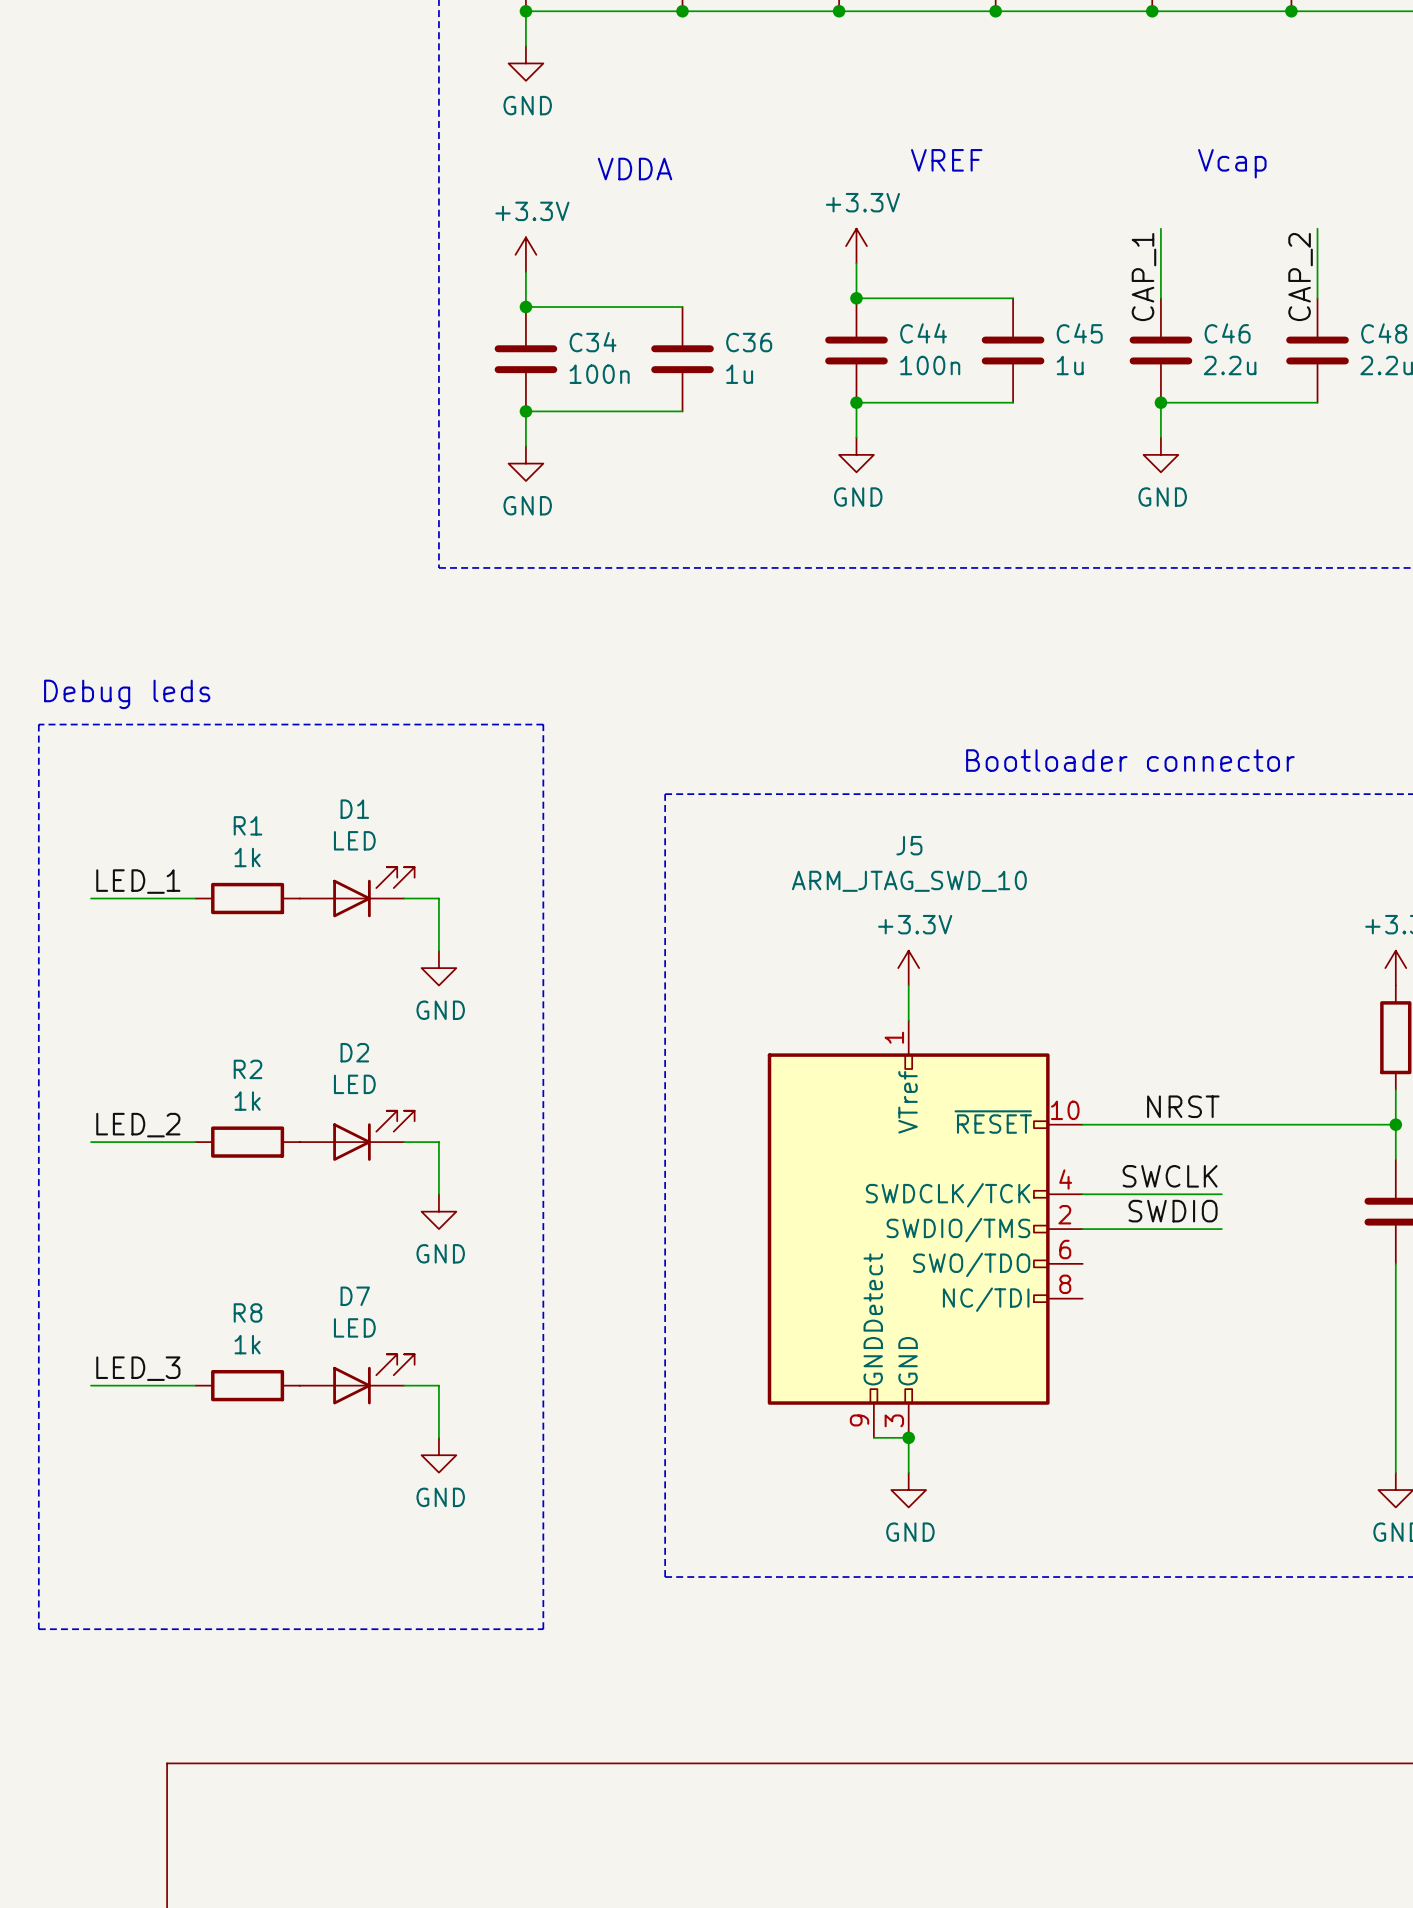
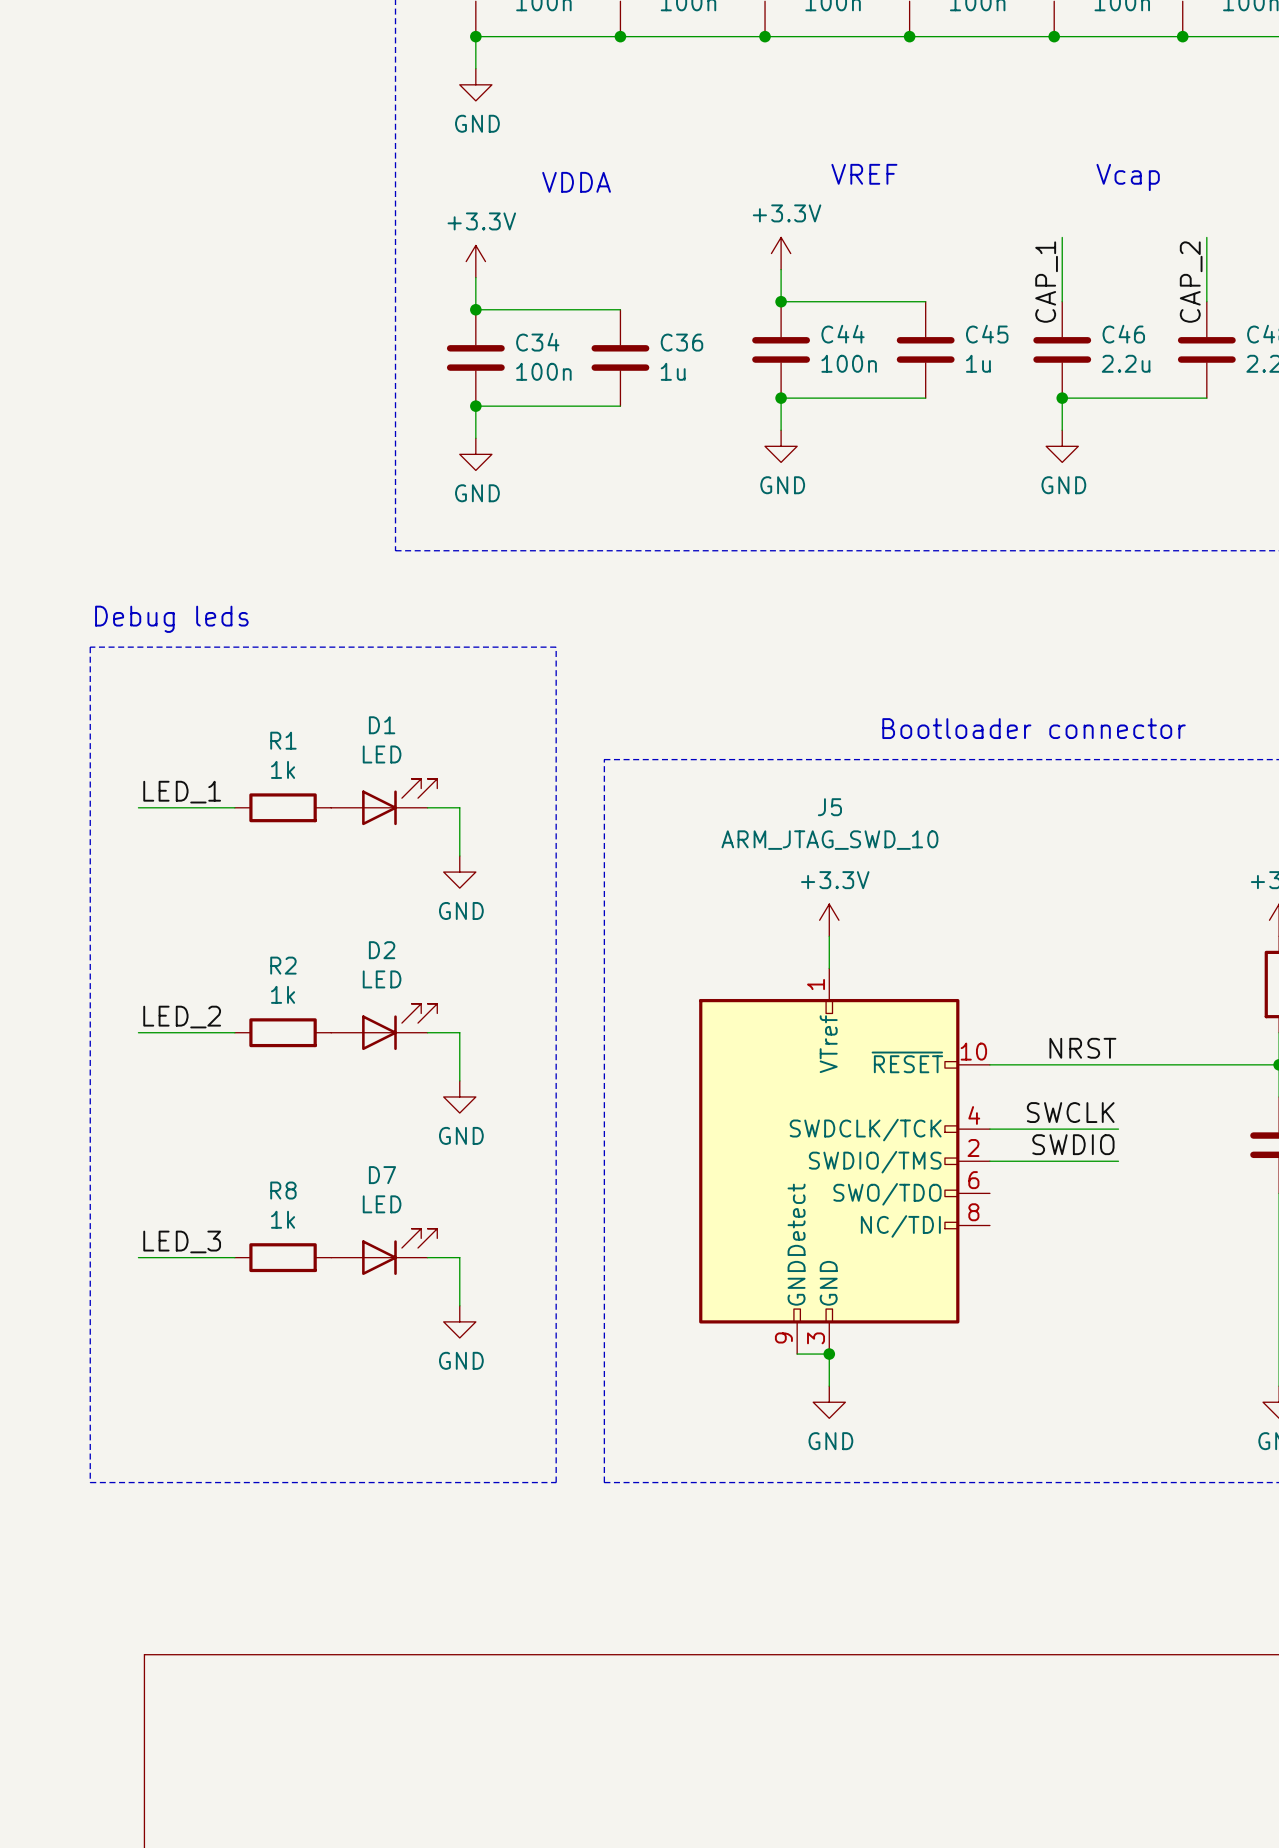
text position: Debug leds (127, 694) -> Debug leds (171, 619)
line: (38, 724) (543, 724) (543, 1629) (38, 1629) (38, 724) -> (90, 647) (556, 647) (556, 1482) (90, 1482) (90, 647)
label position: LED_1 (138, 881) -> LED_1 (182, 792)
D1 position: (357, 892) -> (384, 802)
wire: (91, 898) (195, 898) -> (138, 807) (234, 807)
R1 position: (247, 898) -> (283, 807)
wire: (404, 898) (438, 898) (438, 950) -> (427, 807) (459, 807) (459, 855)
power symbol position: GND (438, 968) -> GND (459, 872)
label position: LED_2 (138, 1125) -> LED_2 (182, 1017)
D2 position: (357, 1135) -> (384, 1026)
wire: (91, 1142) (195, 1142) -> (138, 1032) (234, 1032)
R2 position: (247, 1142) -> (283, 1032)
wire: (404, 1142) (438, 1142) (438, 1194) -> (427, 1032) (459, 1032) (459, 1080)
power symbol position: GND (438, 1211) -> GND (459, 1096)
label position: LED_3 (138, 1368) -> LED_3 (182, 1241)
D7 position: (357, 1379) -> (384, 1251)
wire: (91, 1385) (195, 1385) -> (138, 1257) (234, 1257)
R8 position: (247, 1385) -> (283, 1257)
wire: (404, 1385) (438, 1385) (438, 1437) -> (427, 1257) (459, 1257) (459, 1305)
power symbol position: GND (438, 1455) -> GND (459, 1321)

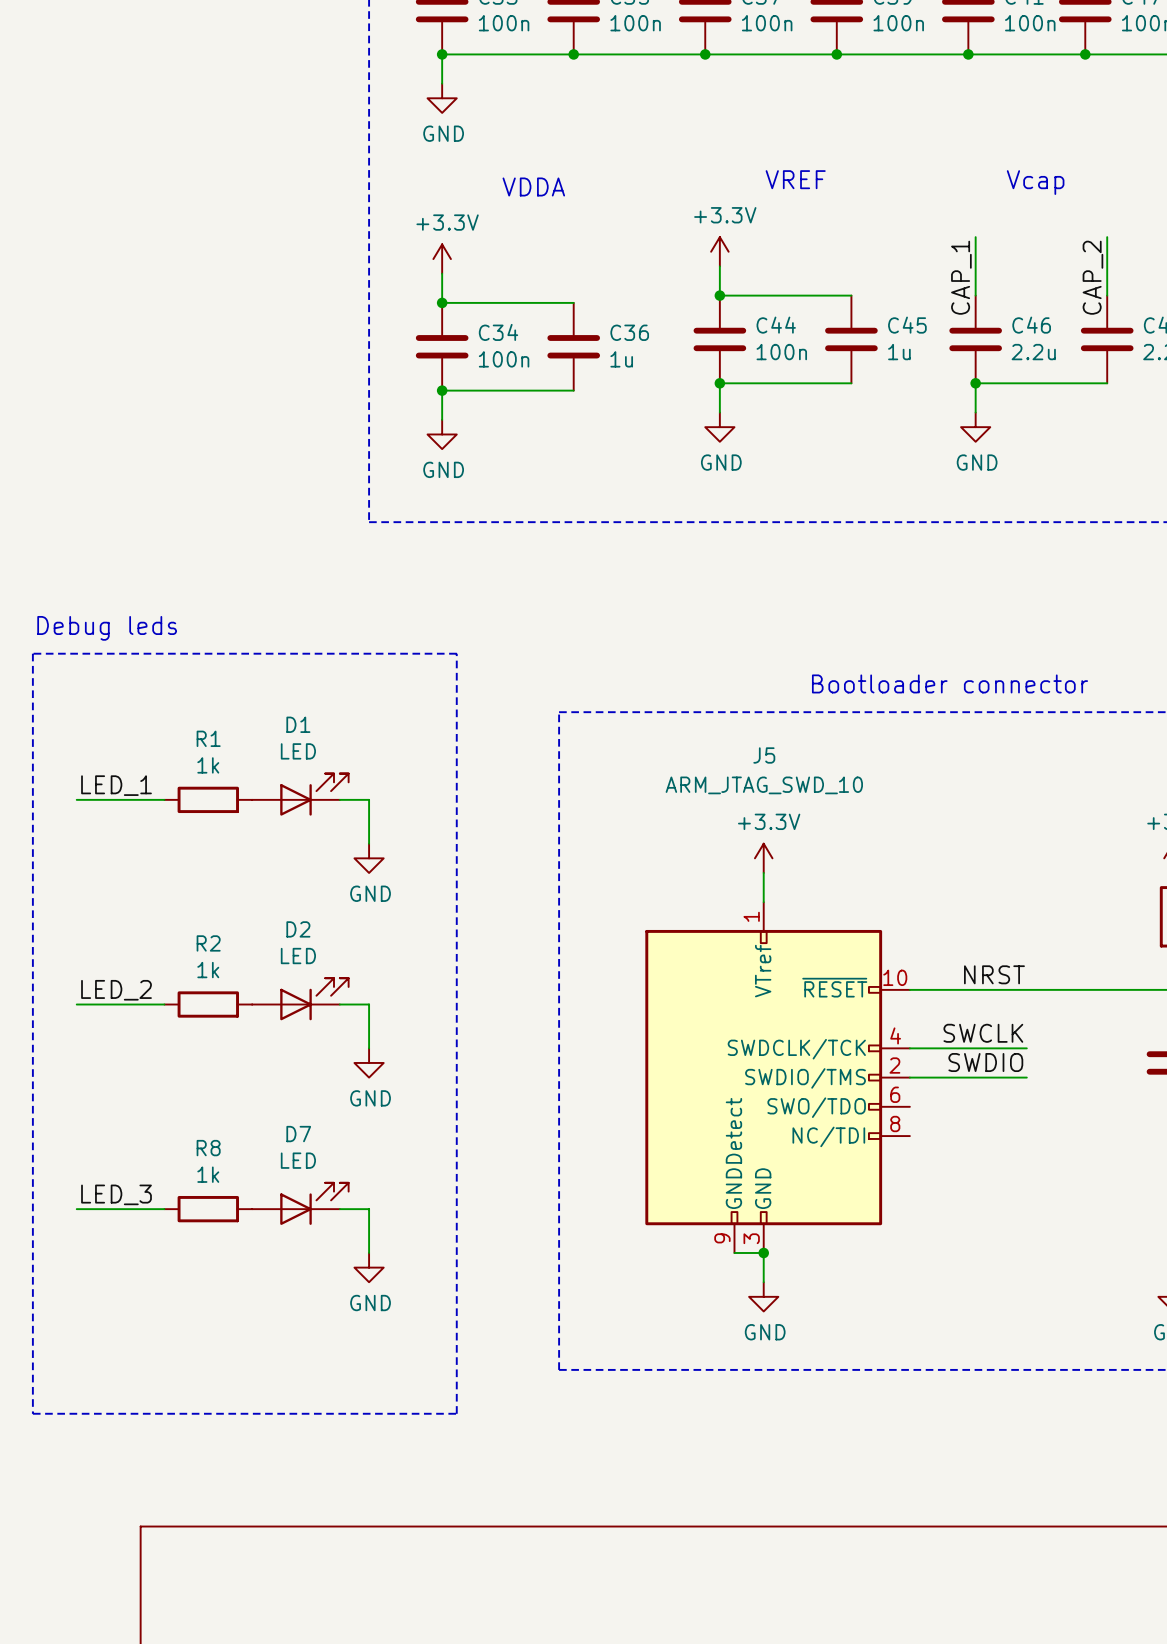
text position: Debug leds (171, 619) -> Debug leds (107, 628)
line: (90, 647) (556, 647) (556, 1482) (90, 1482) (90, 647) -> (32, 653) (456, 653) (456, 1413) (32, 1413) (32, 653)
label position: LED_1 (182, 792) -> LED_1 (116, 785)
D1 position: (384, 802) -> (300, 794)
wire: (138, 807) (234, 807) -> (76, 799) (164, 799)
R1 position: (283, 807) -> (208, 799)
wire: (427, 807) (459, 807) (459, 855) -> (339, 799) (369, 799) (369, 843)
power symbol position: GND (459, 872) -> GND (369, 858)
label position: LED_2 (182, 1017) -> LED_2 (116, 990)
D2 position: (384, 1026) -> (300, 999)
wire: (138, 1032) (234, 1032) -> (76, 1004) (164, 1004)
R2 position: (283, 1032) -> (208, 1004)
wire: (427, 1032) (459, 1032) (459, 1080) -> (339, 1004) (369, 1004) (369, 1048)
power symbol position: GND (459, 1096) -> GND (369, 1062)
label position: LED_3 (182, 1241) -> LED_3 (116, 1194)
D7 position: (384, 1251) -> (300, 1203)
wire: (138, 1257) (234, 1257) -> (76, 1209) (164, 1209)
R8 position: (283, 1257) -> (208, 1209)
wire: (427, 1257) (459, 1257) (459, 1305) -> (339, 1209) (369, 1209) (369, 1252)
power symbol position: GND (459, 1321) -> GND (369, 1267)

